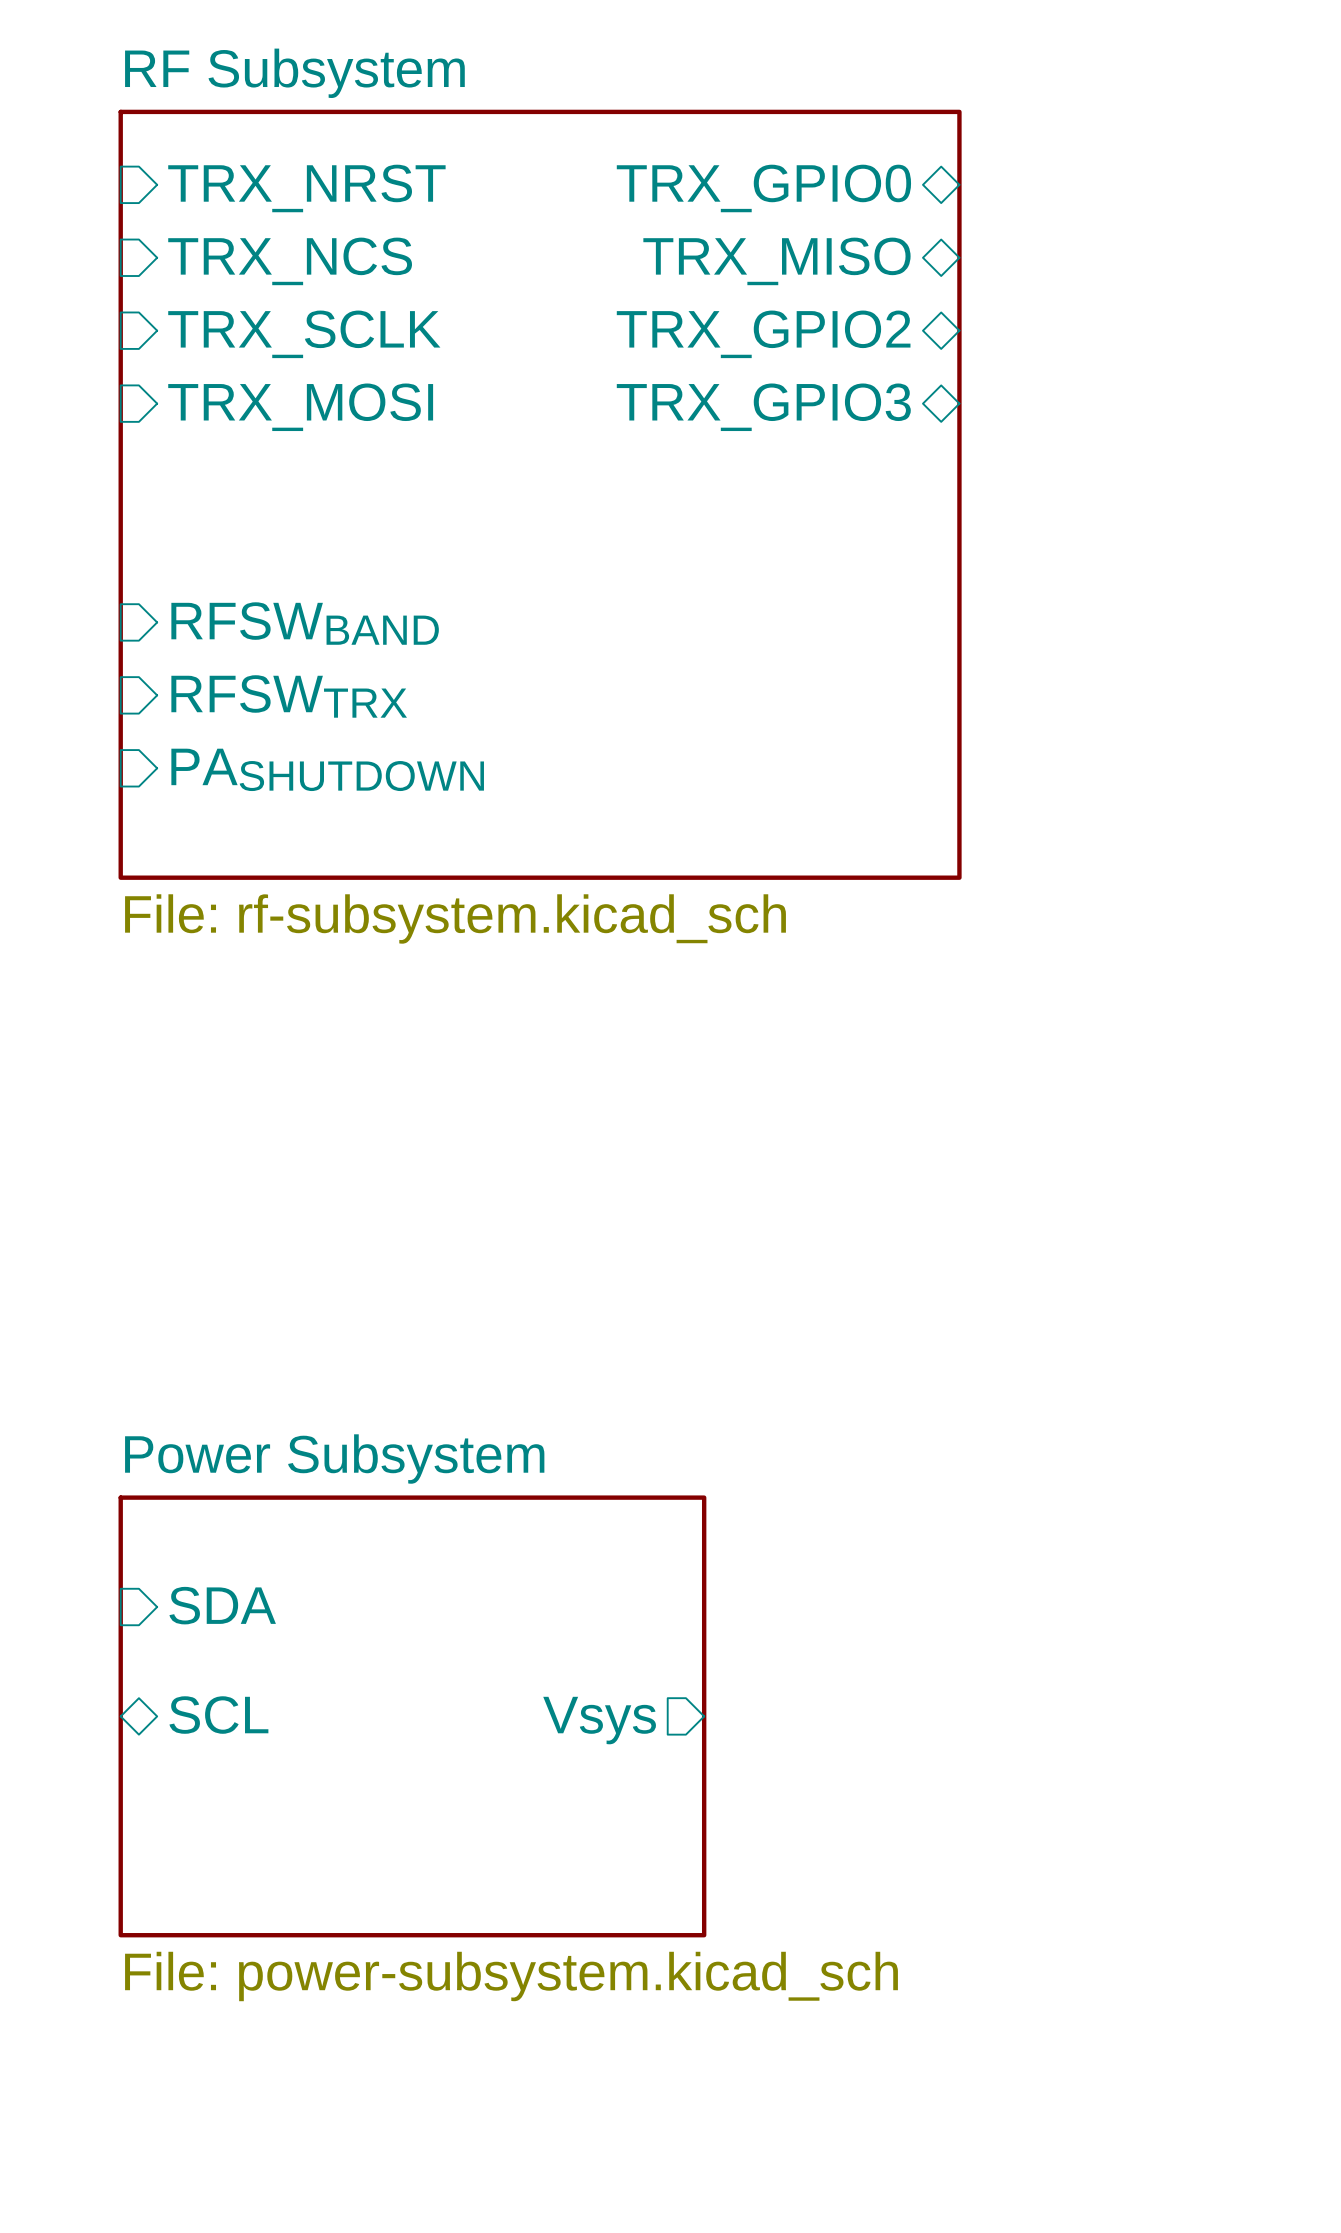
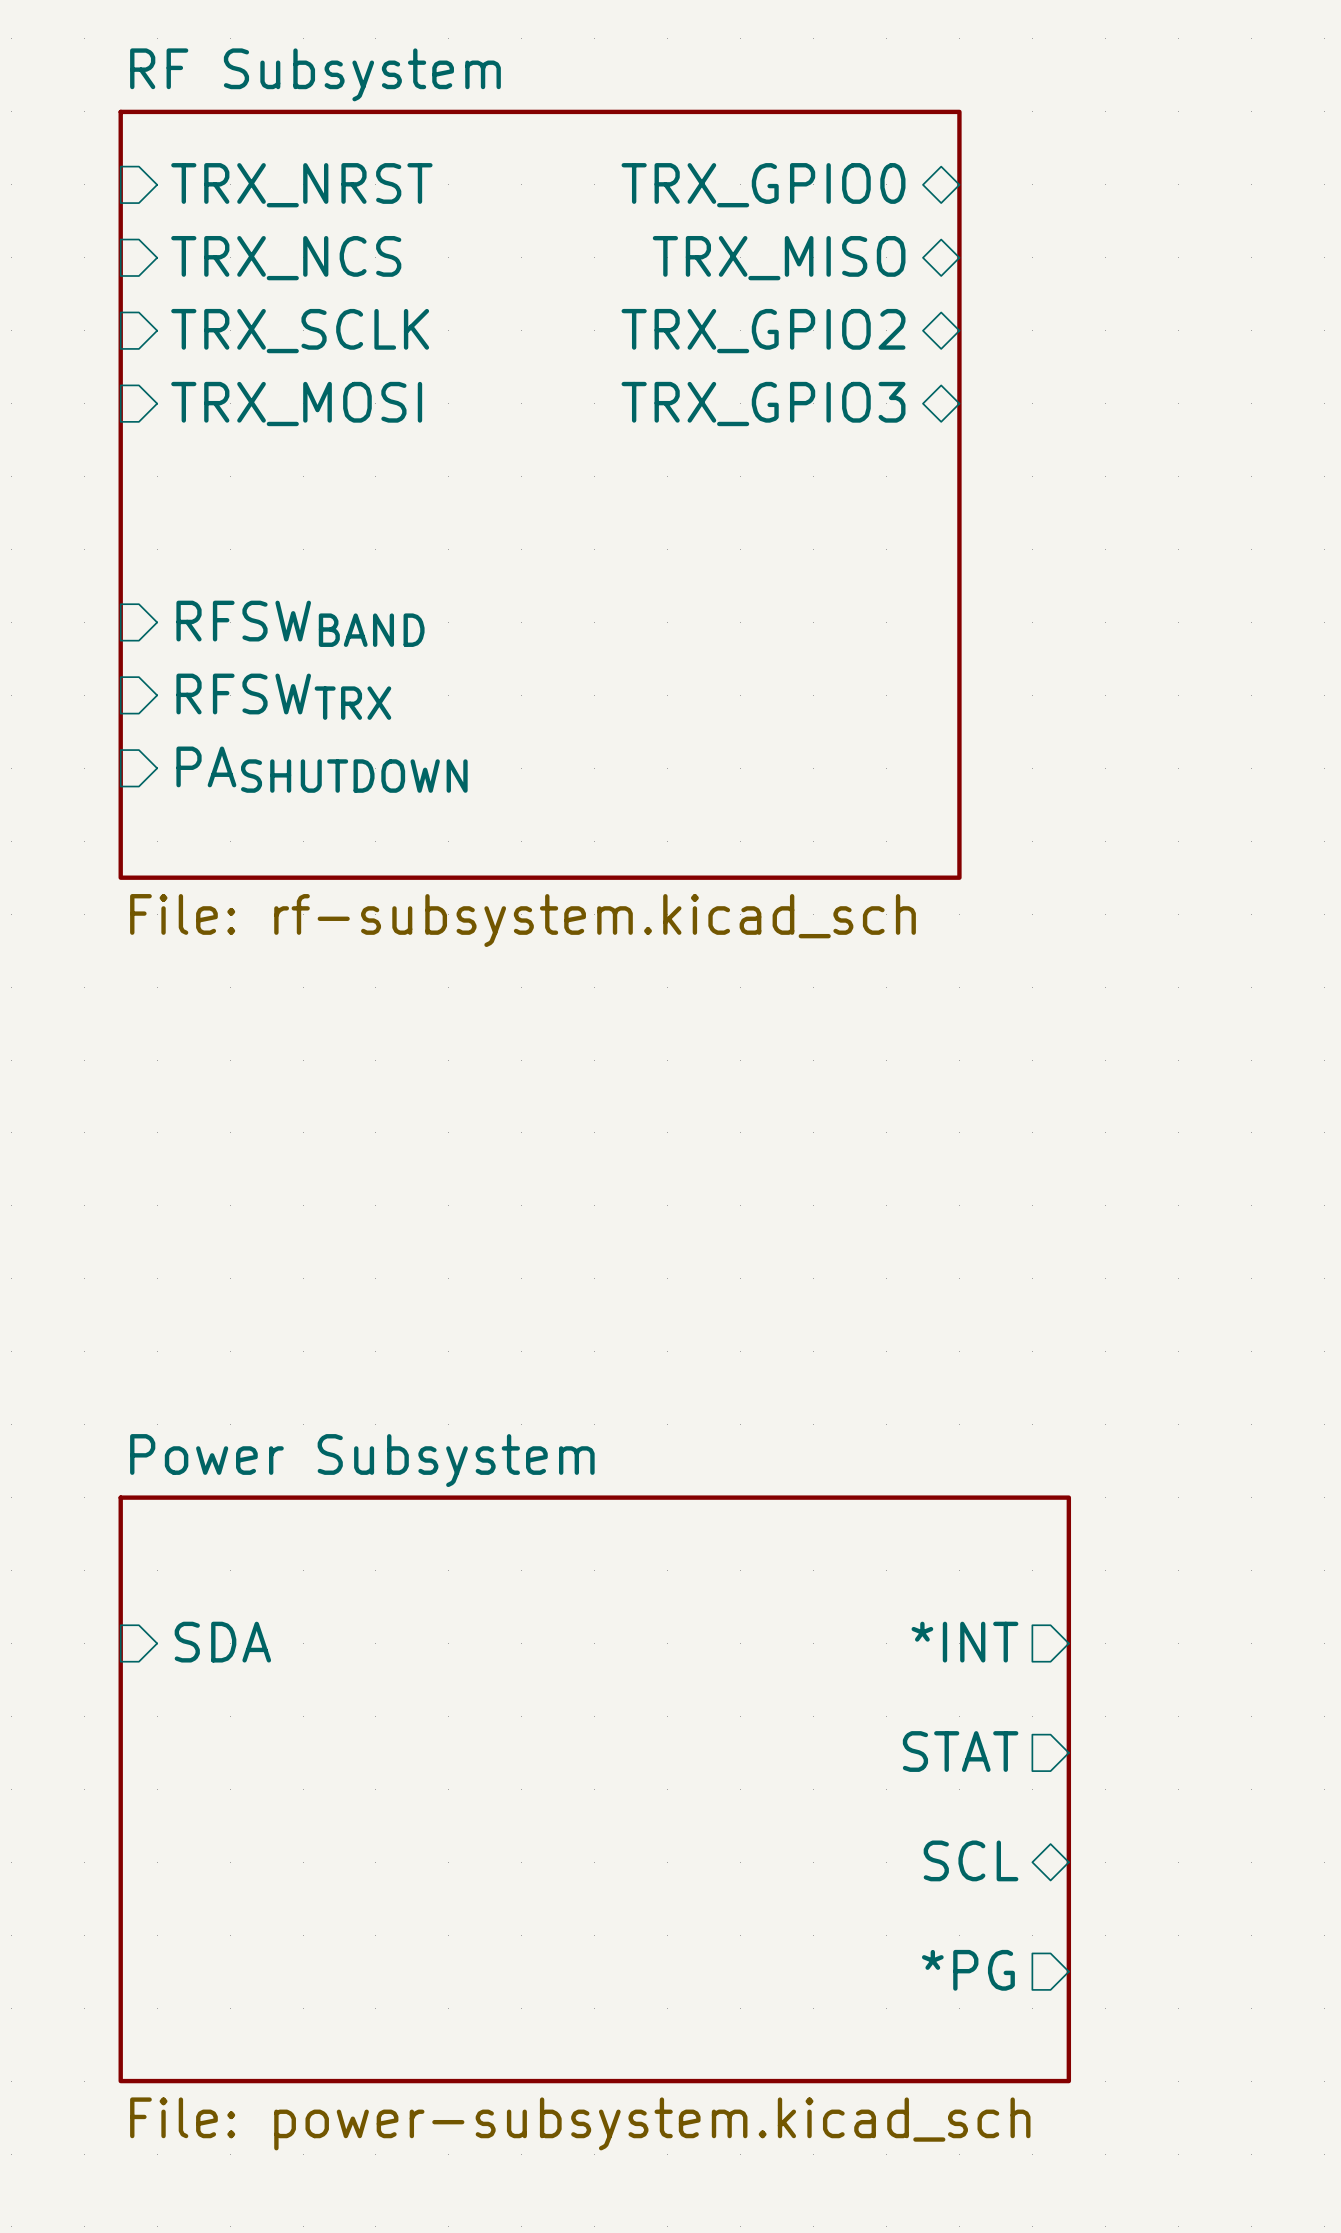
sheet pin position: SDA (222, 1605) -> SDA (222, 1642)
sheet pin: none -> *INT (964, 1642)
sheet pin: SCL (218, 1715) -> none
sheet Power Subsystem: File: power-subsystem.kicad_sch (412, 1716) -> none
sheet pin: Vsys (599, 1720) -> none
sheet pin: none -> STAT (960, 1751)
sheet Power Subsystem: none -> File: power-subsystem.kicad_sch (594, 1789)
sheet pin: none -> SCL (971, 1860)
sheet pin: none -> *PG (968, 1970)

